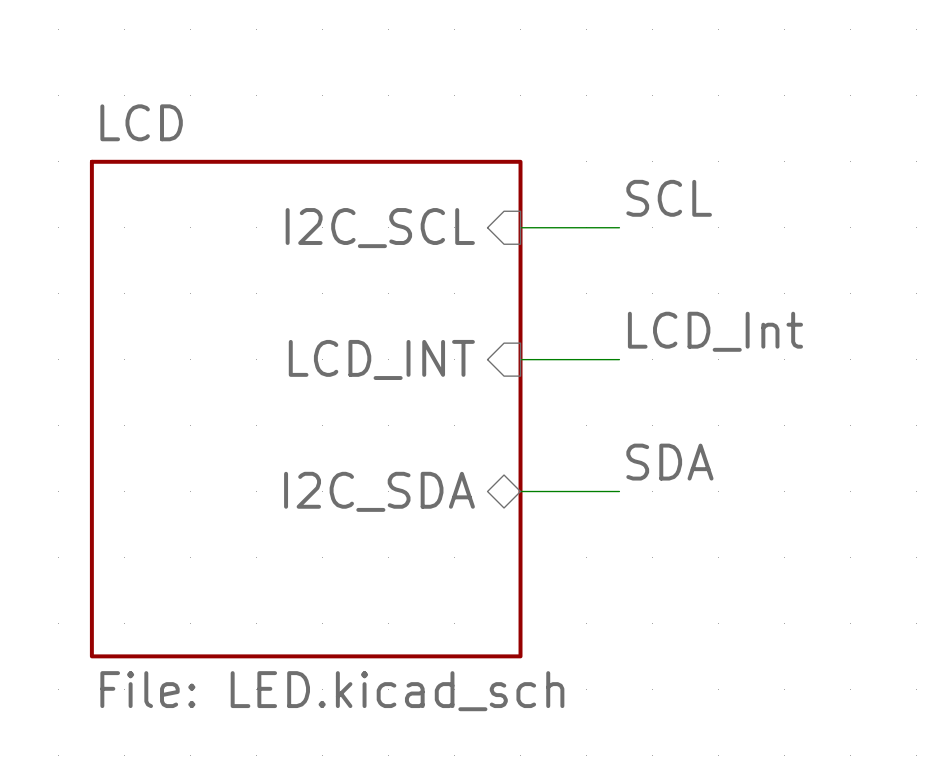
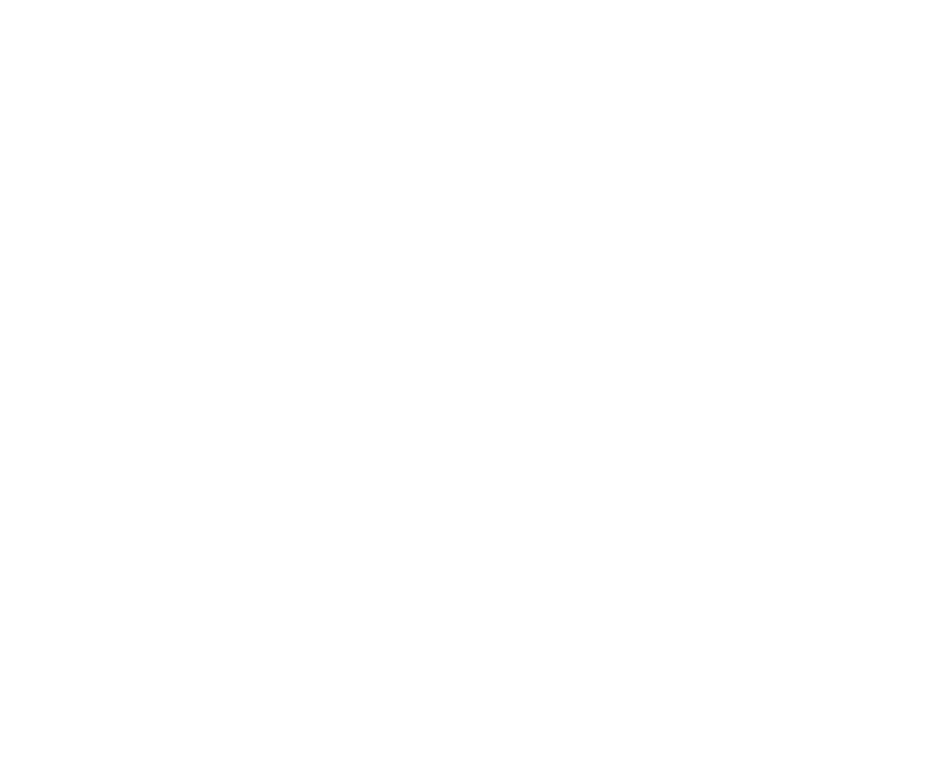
label: SCL (669, 198) -> none
wire: (520, 227) (619, 227) -> none
sheet pin: I2C_SCL (380, 228) -> none
label: LCD_Int (715, 331) -> none
sheet pin: LCD_INT (381, 359) -> none
wire: (520, 359) (619, 359) -> none
sheet LCD: File: LED.kicad_sch (306, 409) -> none
label: SDA (669, 462) -> none
sheet pin: I2C_SDA (379, 491) -> none
wire: (520, 491) (619, 491) -> none

